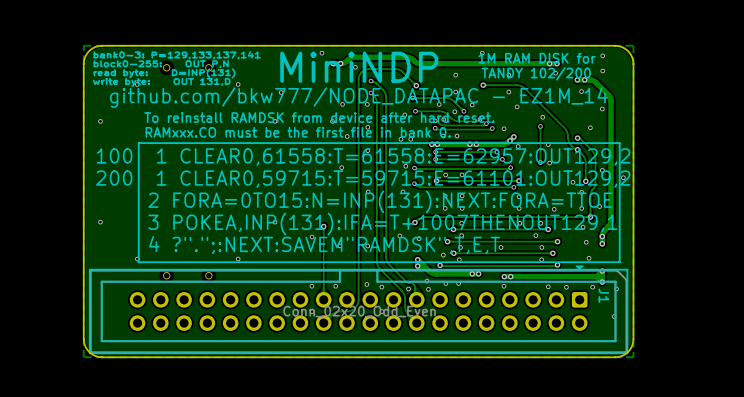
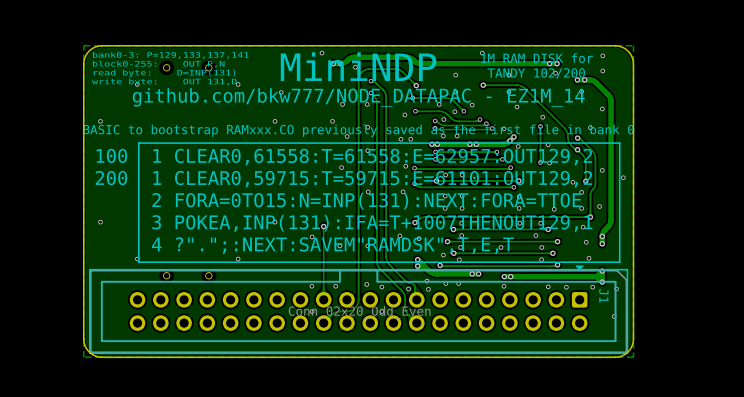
text: To reinstall RAMDSK from device after hard reset. (319, 117) -> none
text: RAMxxx.CO must be the first file in bank 0. (298, 132) -> BASIC to bootstrap RAMxxx.CO previously saved as the first file in bank 0 (358, 130)

